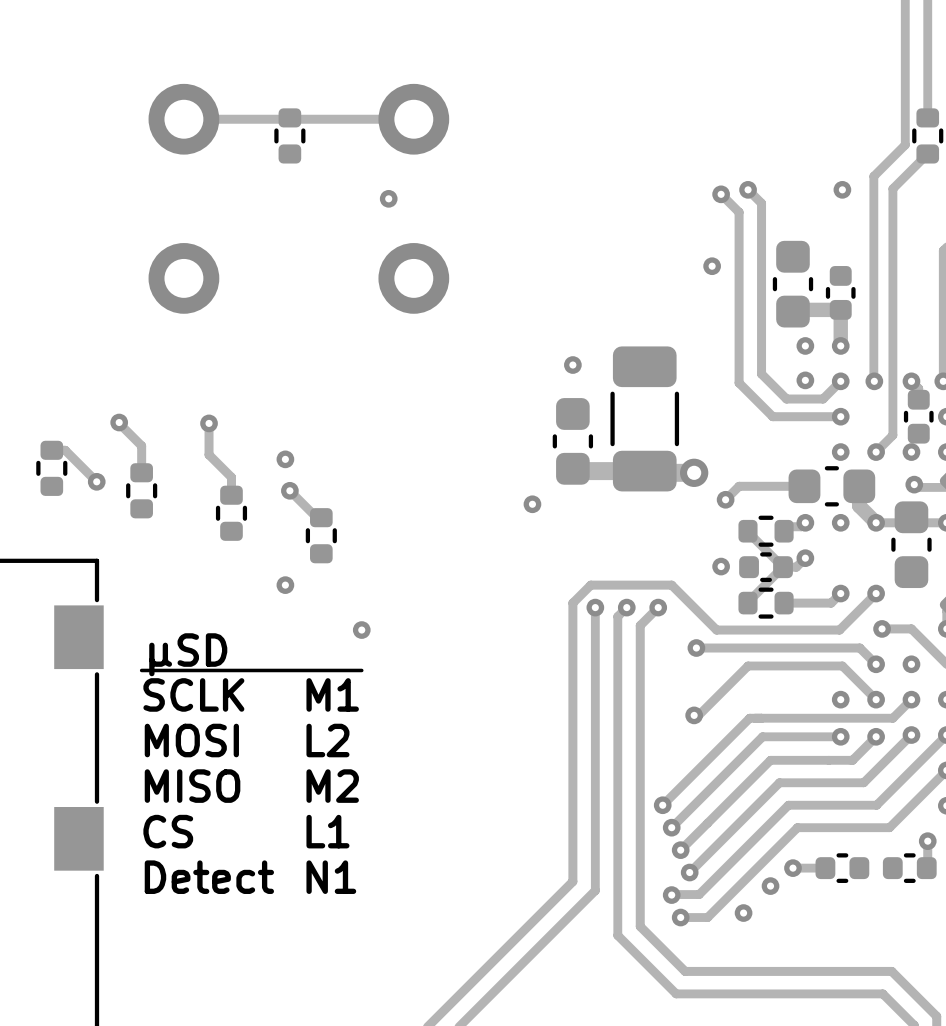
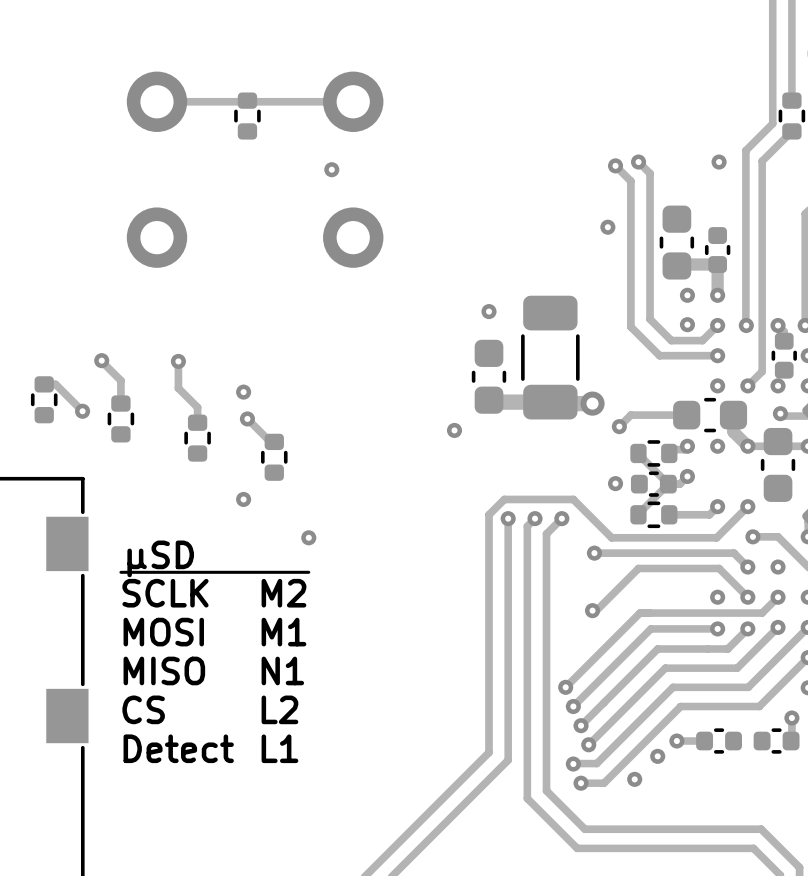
text: M1 (332, 694) -> M2 (283, 593)
text: L2 (327, 740) -> M1 (283, 632)
text: M2 (332, 786) -> N1 (282, 670)
text: L1 (327, 831) -> L2 (279, 709)
text: N1 (331, 877) -> L1 (279, 748)

